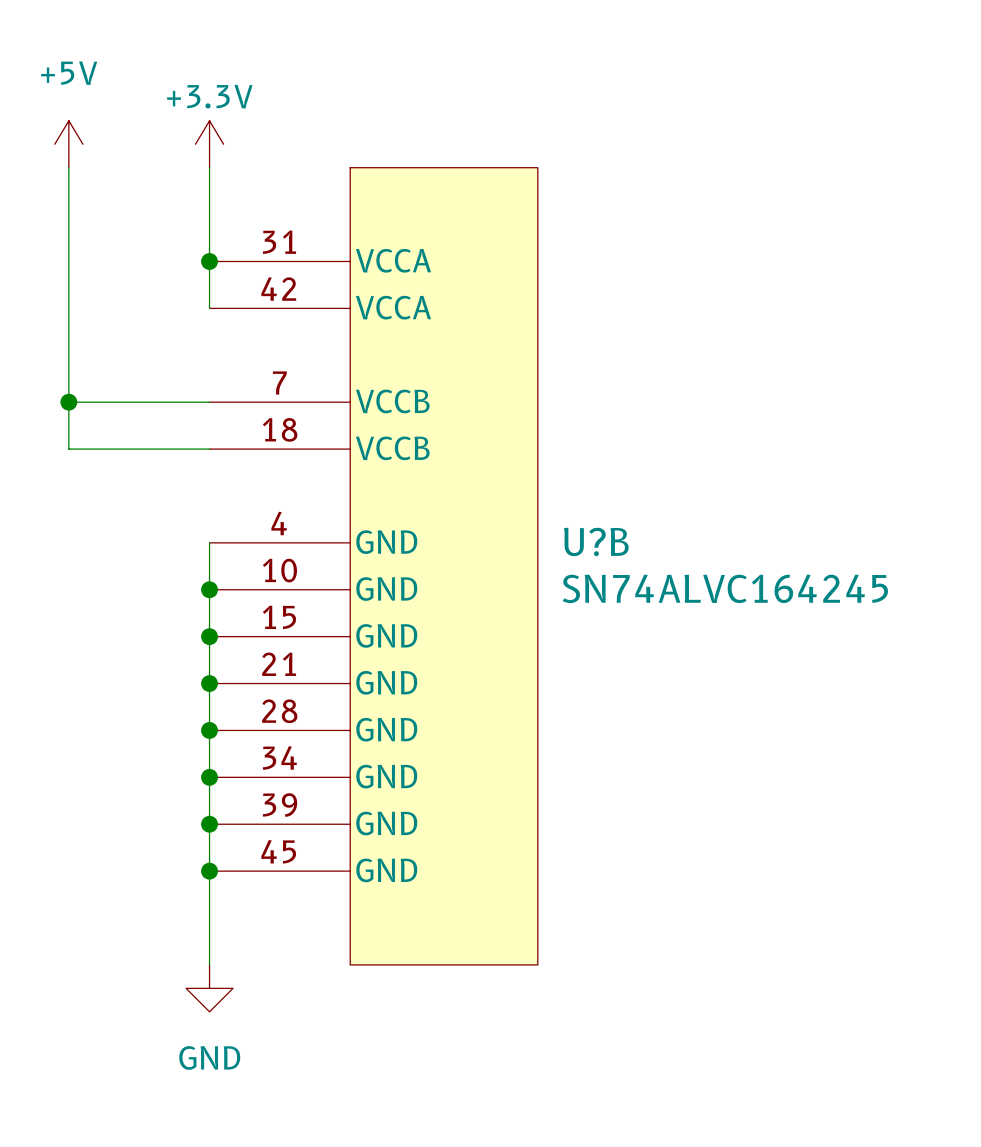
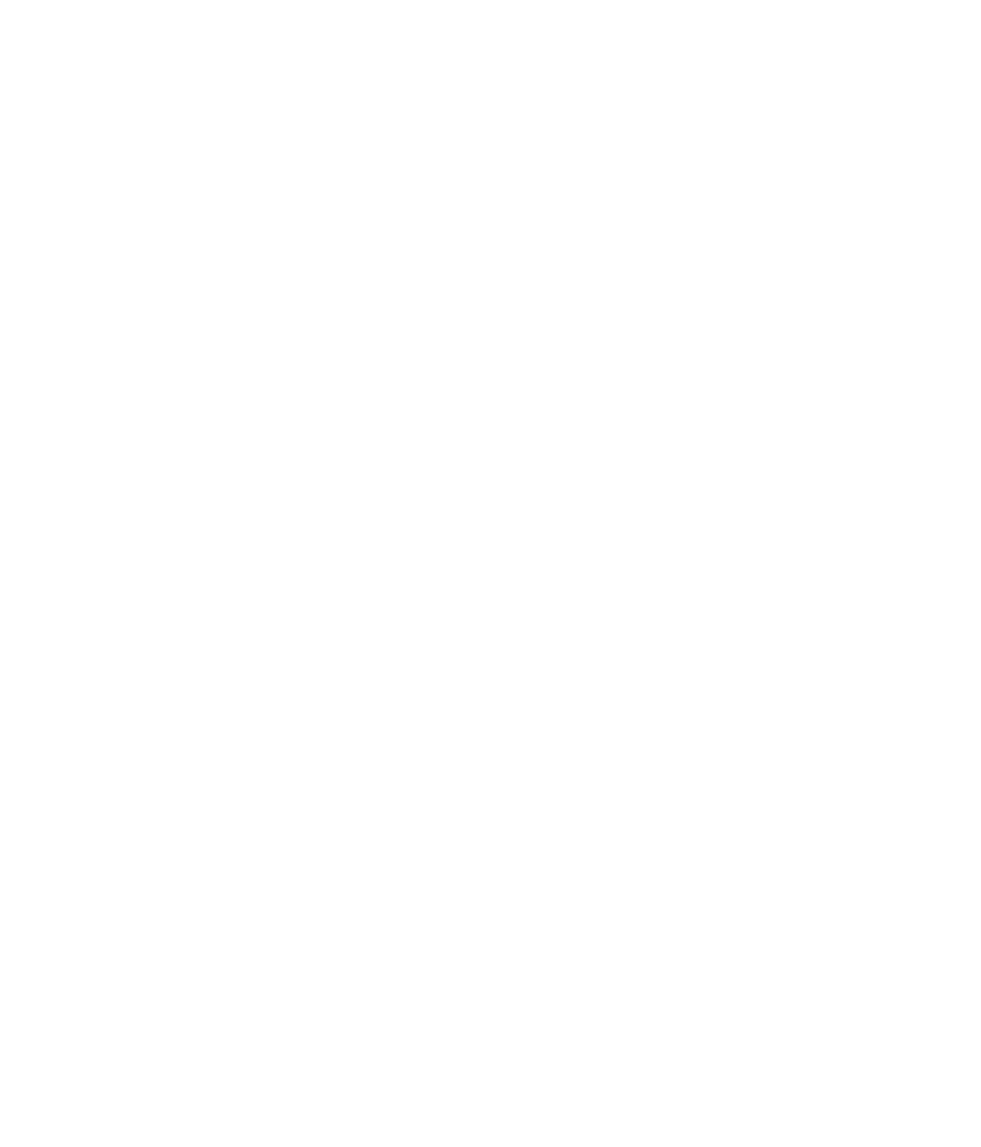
power symbol: +5V (68, 144) -> none
power symbol: +3.3V (209, 144) -> none
wire: (68, 167) (68, 449) (209, 449) -> none
wire: (209, 167) (209, 308) -> none
junction: (209, 261) -> none
wire: (68, 402) (209, 402) -> none
junction: (68, 402) -> none
wire: (209, 542) (209, 964) -> none
U?B: SN74ALVC164245 (373, 566) -> none
junction: (209, 589) -> none
junction: (209, 636) -> none
junction: (209, 683) -> none
junction: (209, 730) -> none
junction: (209, 777) -> none
junction: (209, 824) -> none
junction: (209, 871) -> none
power symbol: GND (209, 988) -> none

